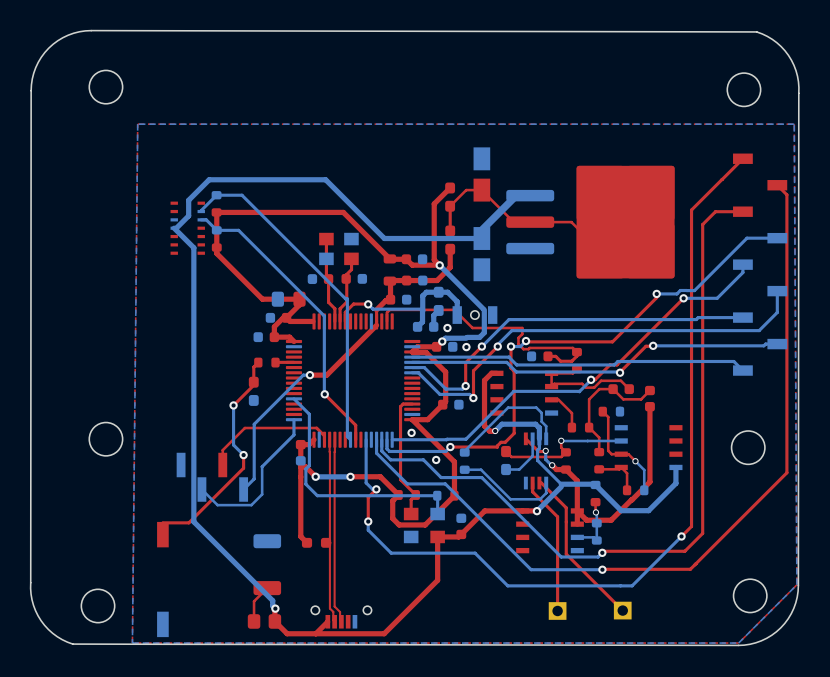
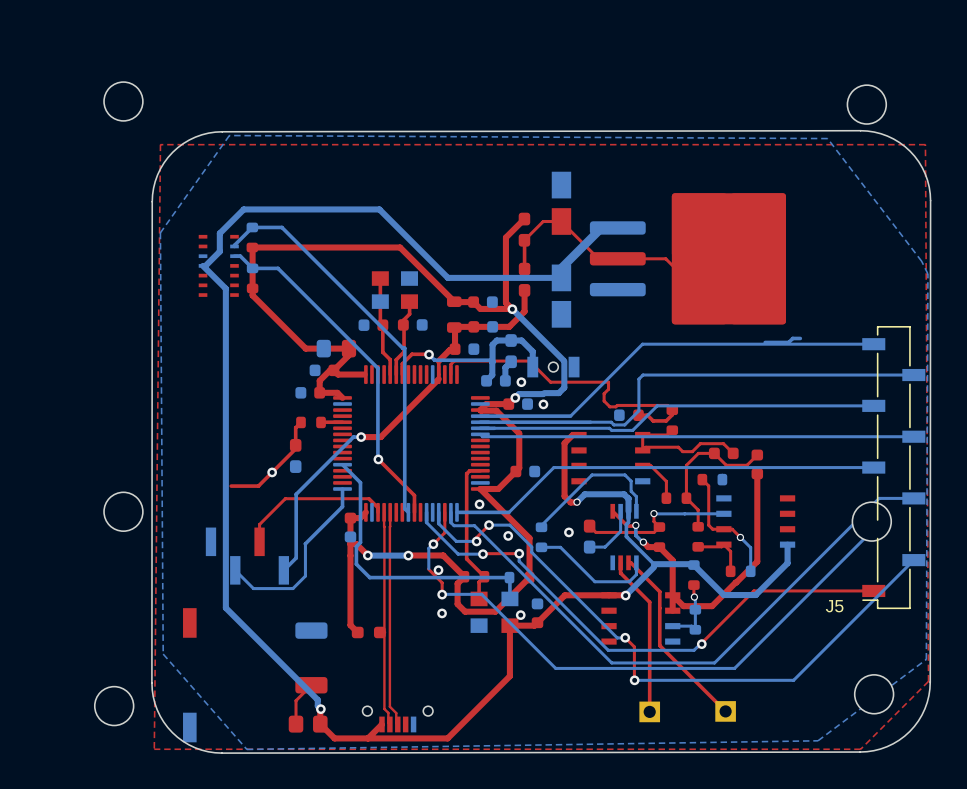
bottom zone outline: (794, 124) (137, 124) (132, 643) (738, 643) (796, 584) (794, 124) -> (229, 135) (827, 138) (921, 261) (927, 273) (926, 659) (818, 740) (246, 749) (163, 654) (160, 232) (229, 135)
top track: (742, 158) (722, 179) -> none
top track: (722, 179) (691, 210) (691, 526) (681, 536) -> none
top track: (777, 185) (786, 194) (786, 472) (690, 569) (602, 569) -> none
top track: (742, 211) (715, 211) (702, 224) (702, 533) (684, 551) (603, 551) (602, 552) -> none
bottom track: (777, 238) (746, 238) (694, 290) (686, 290) -> none
bottom track: (742, 264) (742, 272) (717, 298) (683, 298) -> none
J5 side: top (760, 264) -> bottom (893, 467)
bottom track: (777, 291) (777, 312) (759, 330) (511, 330) (497, 346) -> none
top track: (656, 293) (656, 297) (612, 341) (525, 341) -> none
via: (656, 293) -> none
top track: (683, 298) (617, 364) (609, 364) (595, 379) (591, 379) -> none
via: (683, 298) -> none
part footprint: [285, 313, 421, 448] -> [333, 365, 490, 522]
bottom track: (742, 317) (698, 317) (696, 319) (508, 319) (482, 346) -> none
bottom track: (526, 341) (520, 346) (511, 346) -> none
via: (526, 341) -> none
bottom track: (777, 344) (765, 344) (763, 345) (653, 345) -> none
top track: (653, 345) (645, 346) (618, 373) -> none
via: (653, 345) -> none
top track: (481, 346) (465, 362) (465, 386) -> none
via: (481, 346) -> none
top track: (497, 346) (473, 370) (473, 397) -> none
via: (497, 346) -> none
top track: (511, 346) (511, 368) (514, 371) (514, 433) (497, 447) (450, 447) -> none
via: (511, 346) -> none
bottom track: (509, 357) (489, 357) -> (873, 344) (642, 344) (570, 416)
bottom track: (509, 357) (516, 364) (614, 364) (617, 361) (733, 361) (742, 370) -> none
bottom track: (506, 362) (516, 372) (620, 372) -> (590, 422) (611, 422) (613, 424) (624, 424) (638, 410) (638, 379) (643, 375) (913, 375)
bottom track: (424, 367) (445, 389) (462, 389) (465, 386) -> (494, 428) (609, 428) (611, 430) (632, 430) (657, 405) (873, 405)
bottom track: (412, 372) (418, 372) (439, 394) (469, 394) (473, 398) -> (480, 434) (482, 436) (913, 436)
via: (620, 372) -> none
via: (591, 379) -> none
bottom track: (591, 380) (579, 391) (513, 391) (465, 439) (436, 439) -> (873, 467) (553, 467) (509, 512)
via: (465, 386) -> none
via: (473, 398) -> none
top track: none -> (272, 472) (258, 486) (231, 486)
bottom track: (233, 405) (233, 445) (243, 455) -> none
top track: none -> (444, 512) (444, 532) (433, 544)
bottom track: (381, 439) (381, 451) (390, 459) (423, 459) (441, 477) (481, 477) (561, 557) (598, 557) (602, 552) -> none
bottom track: (450, 446) (445, 451) (389, 451) (386, 448) -> (913, 498) (879, 498) (714, 662) (611, 662) (474, 525) (454, 525) (450, 522)
via: (450, 447) -> none
bottom track: (366, 448) (366, 482) (372, 489) (376, 489) -> (426, 522) (458, 554) (482, 554)
bottom track: (376, 449) (376, 453) (407, 483) (445, 483) (531, 569) (602, 569) -> (438, 523) (456, 541) (476, 541)
top track: none -> (489, 525) (476, 537) (476, 541)
bottom track: none -> (489, 525) (509, 525) (531, 547) (531, 552) (617, 637) (625, 637)
via: none -> (489, 525)
bottom track: none -> (873, 529) (734, 668) (555, 668) (481, 594) (441, 594)
top track: (243, 455) (243, 468) (188, 522) (162, 522) (162, 534) -> none
via: (243, 455) -> none
via: none -> (568, 532)
via: none -> (476, 541)
bottom track: none -> (432, 544) (428, 548) (428, 568)
via: none -> (433, 544)
bottom track: none -> (519, 553) (519, 561) (608, 650) (694, 650) (697, 646)
via: none -> (482, 554)
top track: none -> (519, 553) (482, 554)
via: none -> (519, 553)
bottom track: none -> (913, 560) (793, 680) (634, 680)
top track: none -> (428, 569) (442, 582) (442, 594)
top track: (376, 489) (368, 497) (368, 521) -> none
top track: none -> (873, 590) (753, 590) (697, 647)
via: none -> (442, 594)
bottom track: (368, 521) (368, 530) (391, 553) (475, 553) (507, 585) (632, 585) (681, 536) -> none
via: (368, 521) -> none
via: none -> (442, 613)
via: none -> (520, 615)
via: (681, 536) -> none
top track: none -> (625, 637) (634, 646) (634, 680)
via: none -> (625, 637)
via: (602, 569) -> none
via: none -> (634, 680)
board edge: (798, 585) (798, 87) (797, 76) (791, 60) (781, 46) (772, 39) (756, 31) (91, 30) (73, 33) (62, 37) (44, 52) (33, 73) (31, 90) (30, 588) (35, 610) (44, 625) (52, 633) (72, 644) (738, 645) -> (930, 682) (930, 193) (922, 167) (910, 151) (899, 142) (880, 133) (860, 130) (222, 131) (195, 137) (177, 147) (168, 157) (157, 174) (152, 201) (151, 683) (157, 709) (167, 727) (177, 737) (201, 750) (221, 753) (860, 752)

